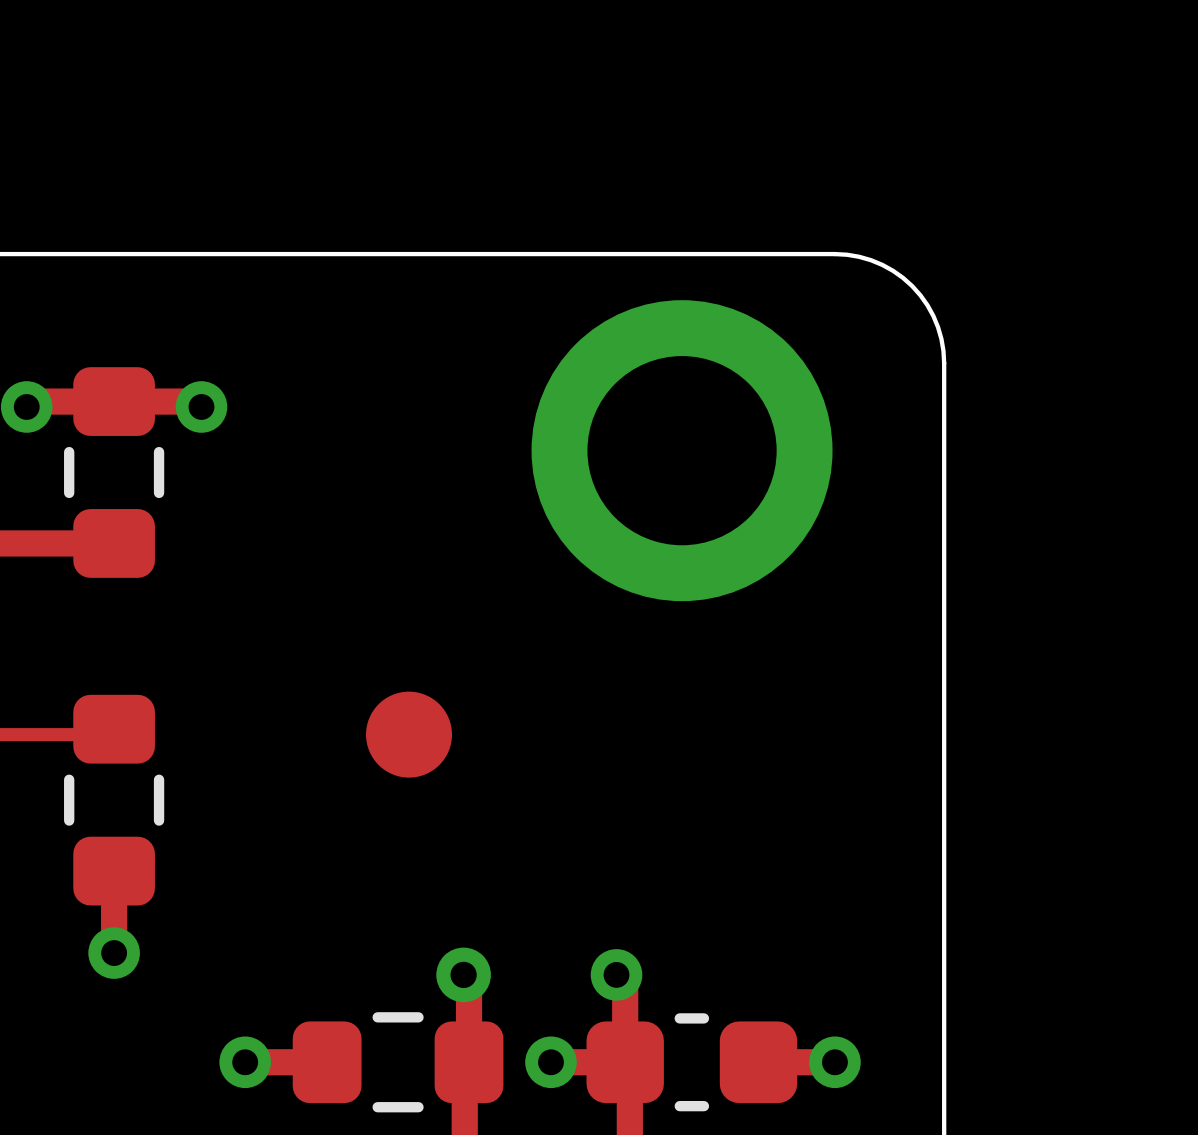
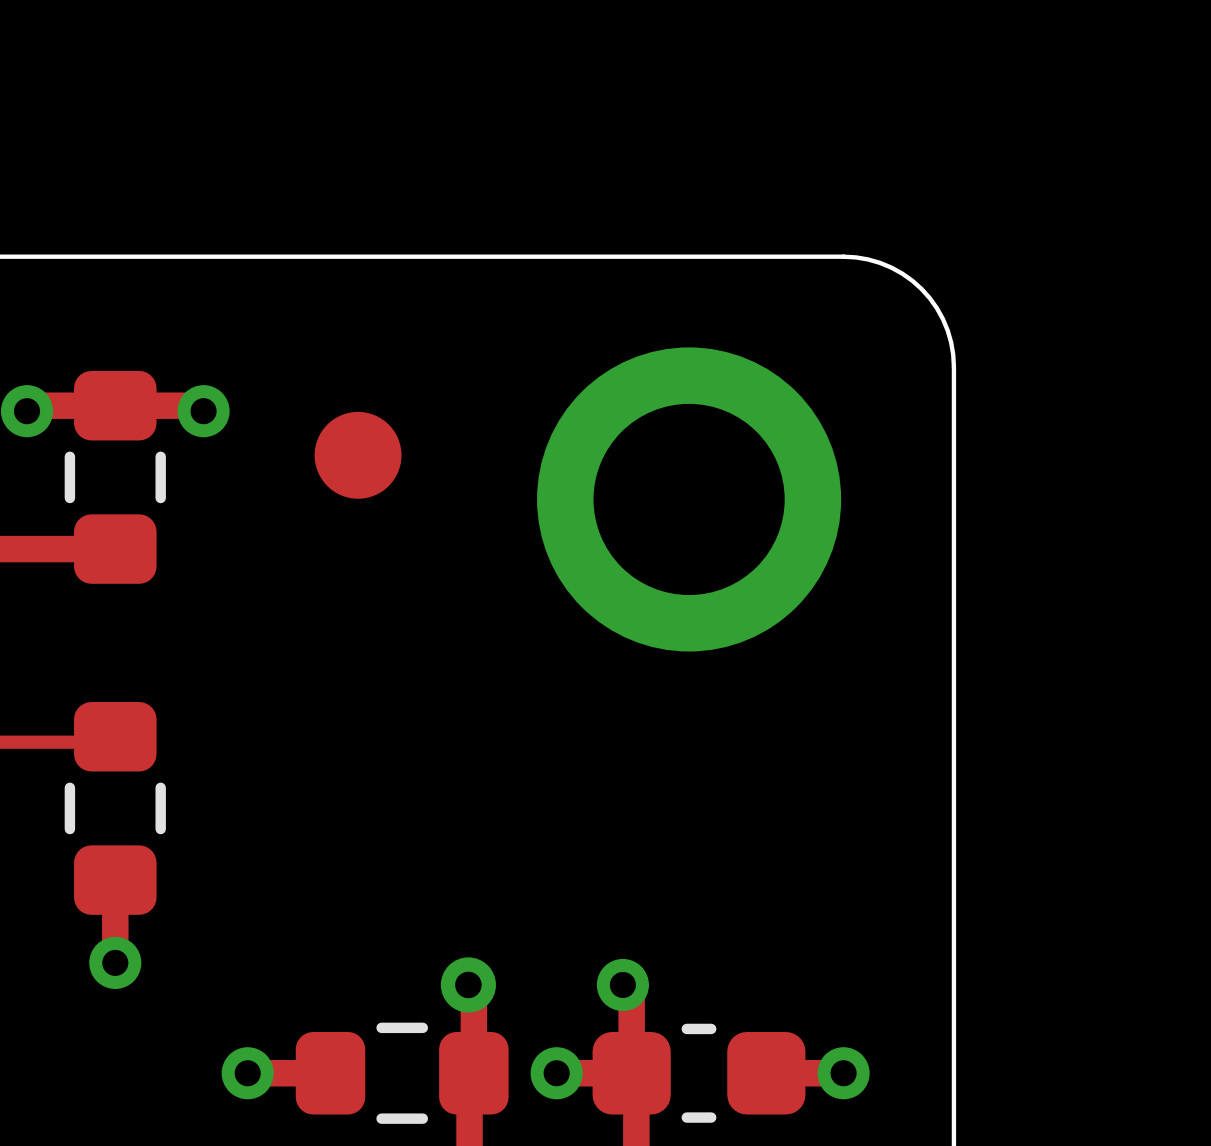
part position: (682, 450) -> (689, 499)
part position: (409, 734) -> (358, 455)

